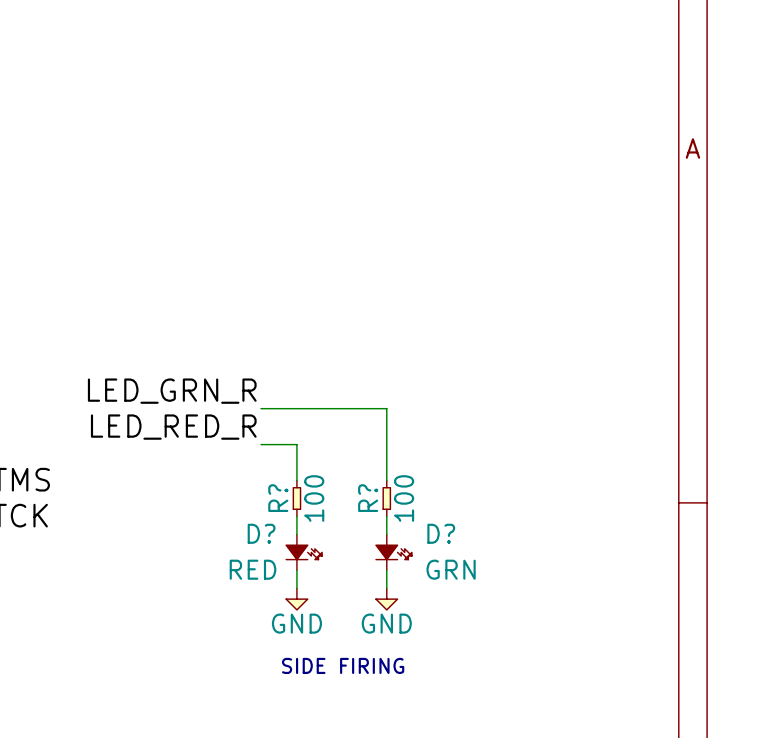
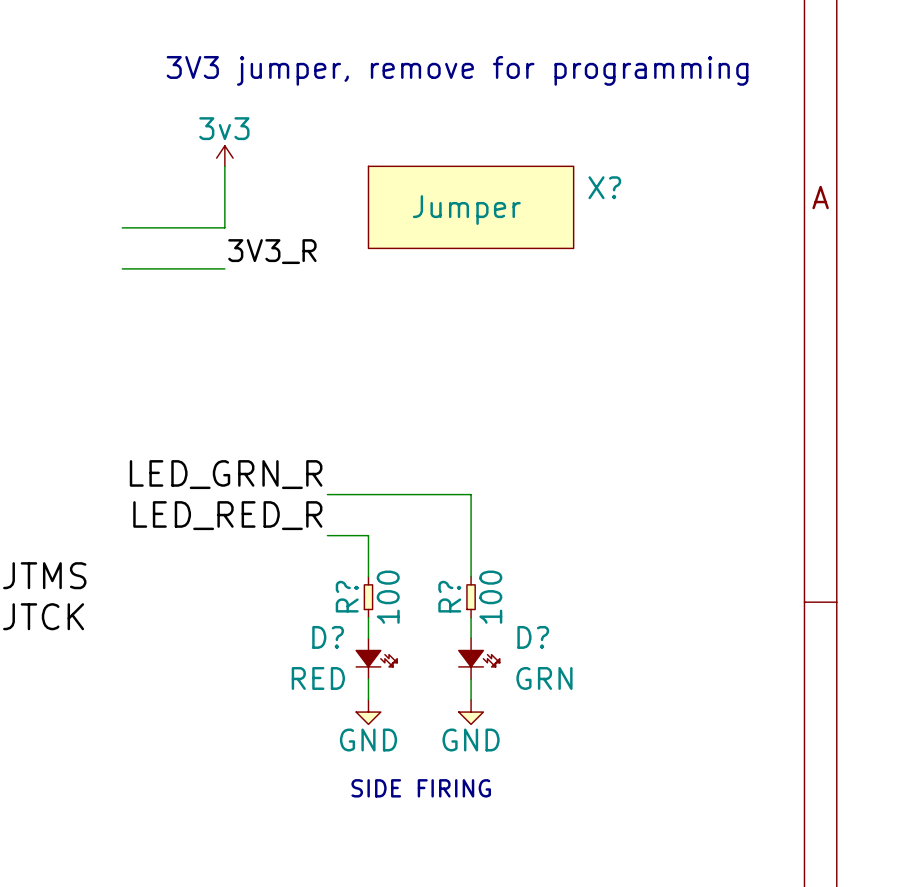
text: none -> 3V3 jumper, remove for programming (457, 70)
power symbol: none -> 3v3 (224, 156)
wire: none -> (224, 166) (224, 227) (122, 227)
X?: none -> Jumper (471, 207)
label: none -> 3V3_R (272, 251)
wire: none -> (122, 268) (224, 268)

